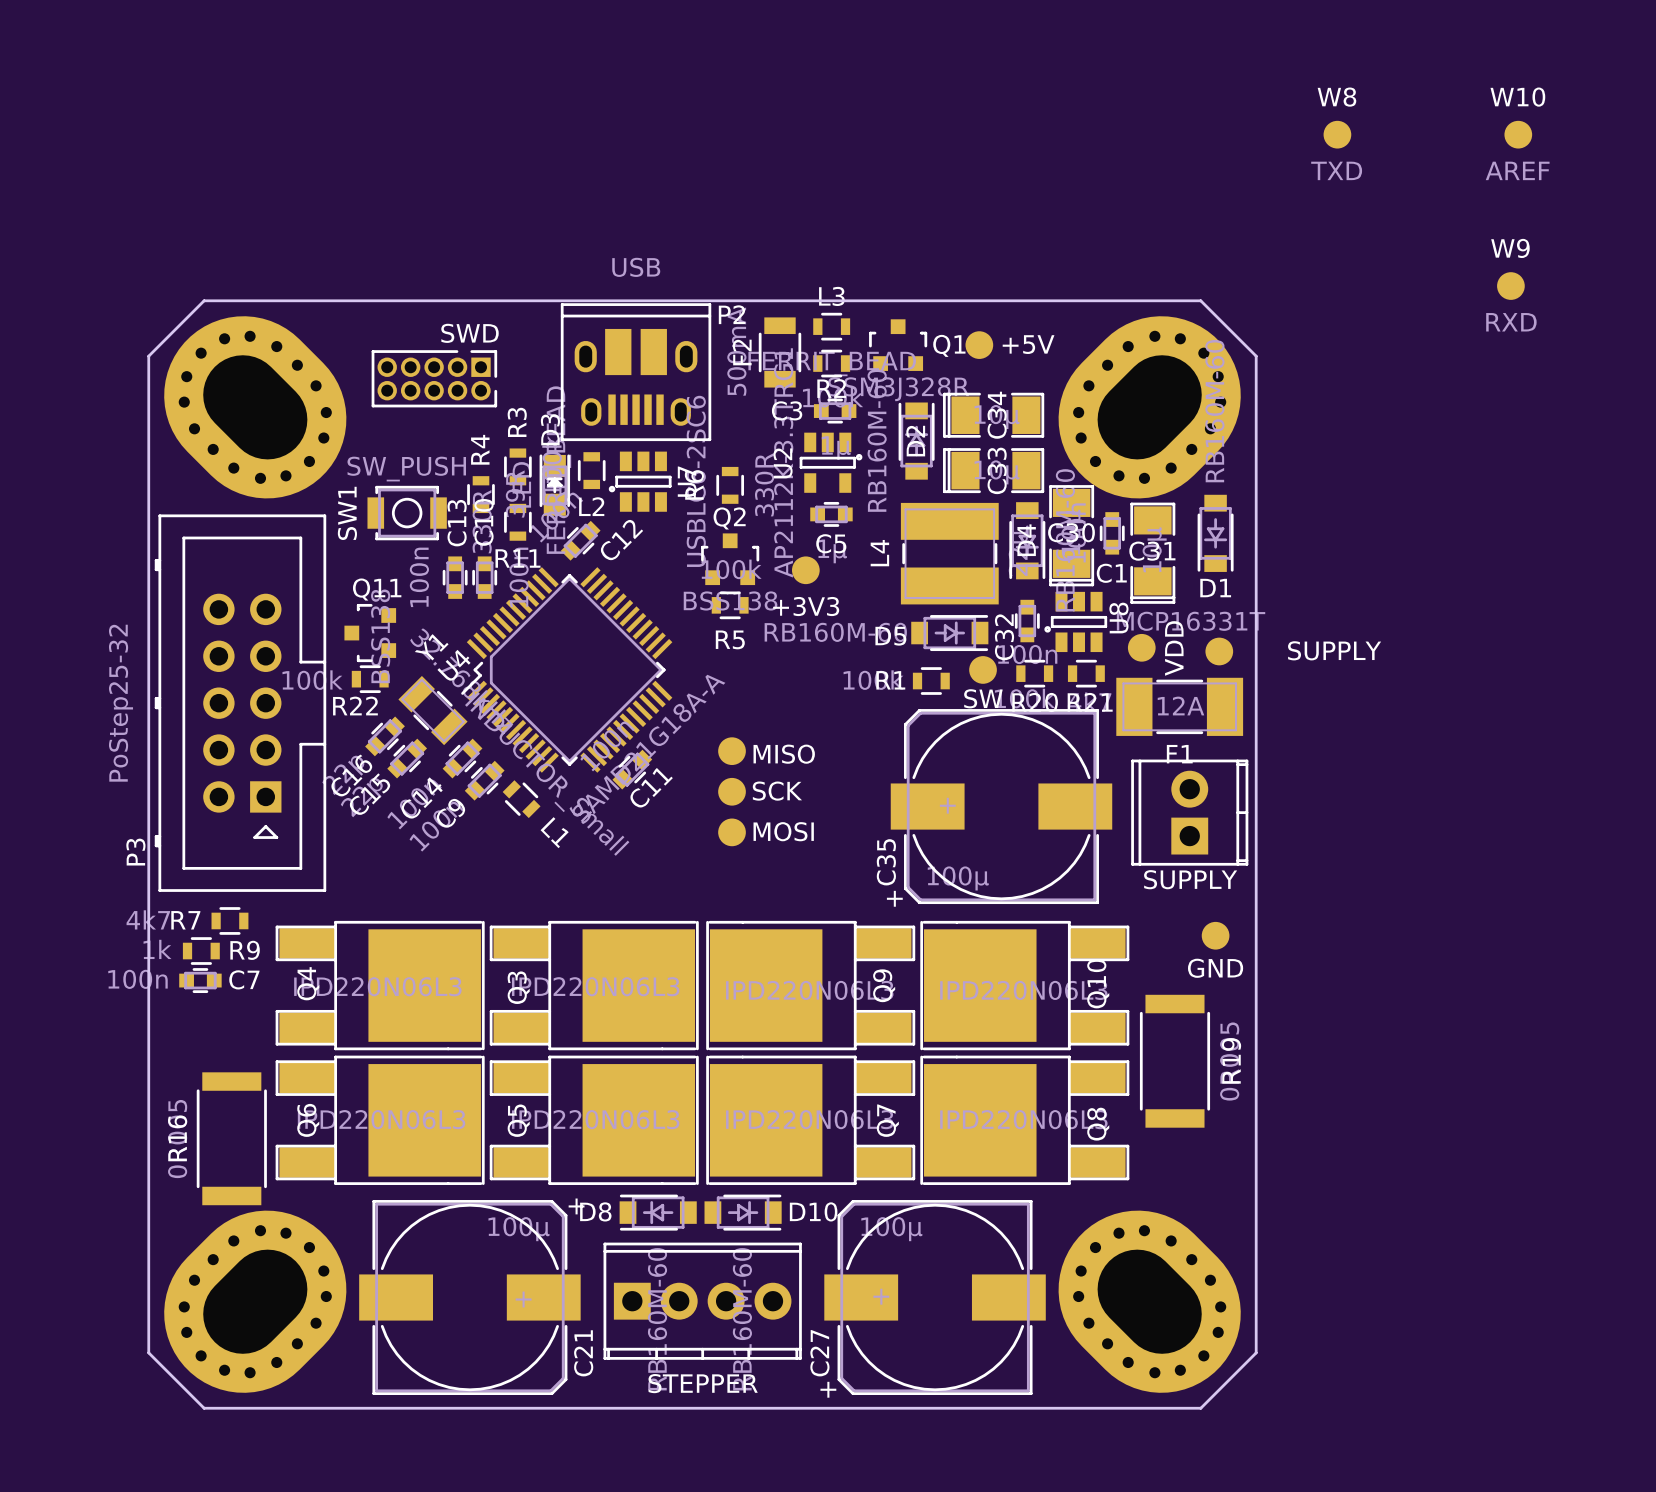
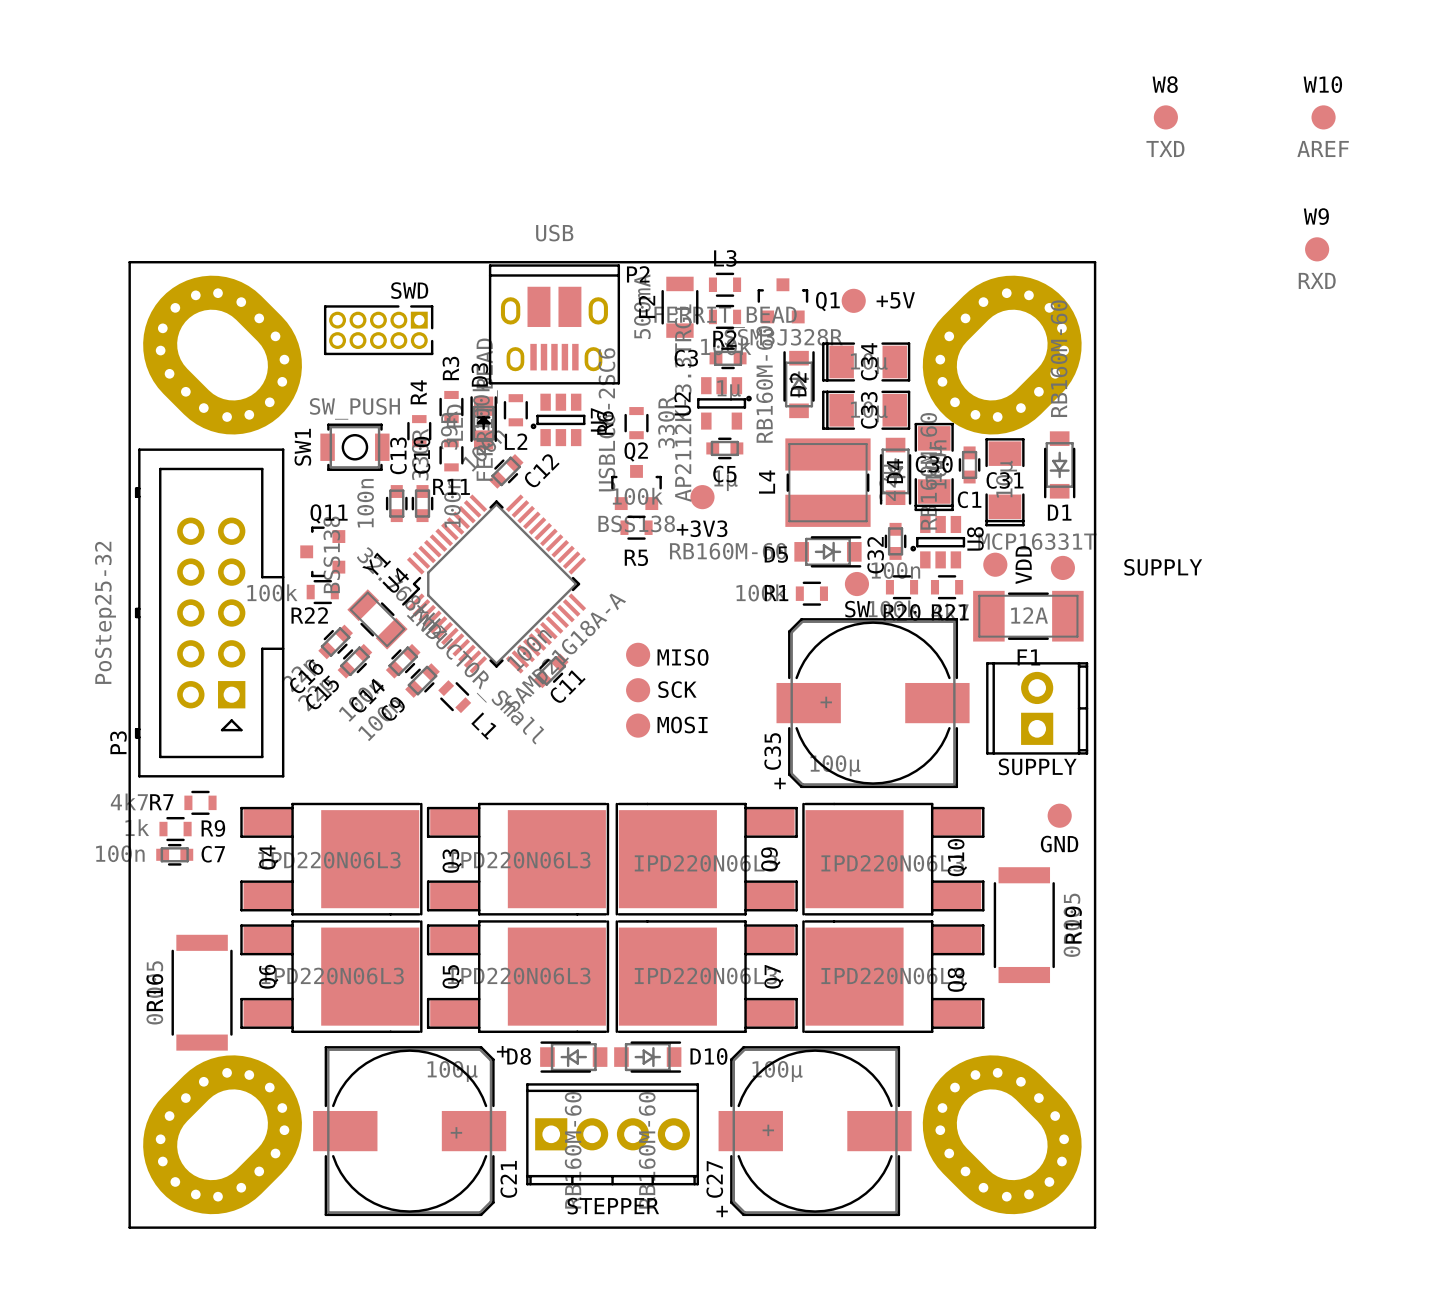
board edge: (204, 300) (148, 356) -> (177, 262) (129, 262) (129, 310)
board edge: (1200, 300) (1256, 356) -> (1046, 262) (1095, 262) (1095, 310)
board edge: (148, 1352) (204, 1408) -> (129, 1179) (129, 1227) (177, 1227)
board edge: (1256, 1352) (1200, 1408) -> (1095, 1179) (1095, 1227) (1046, 1227)

